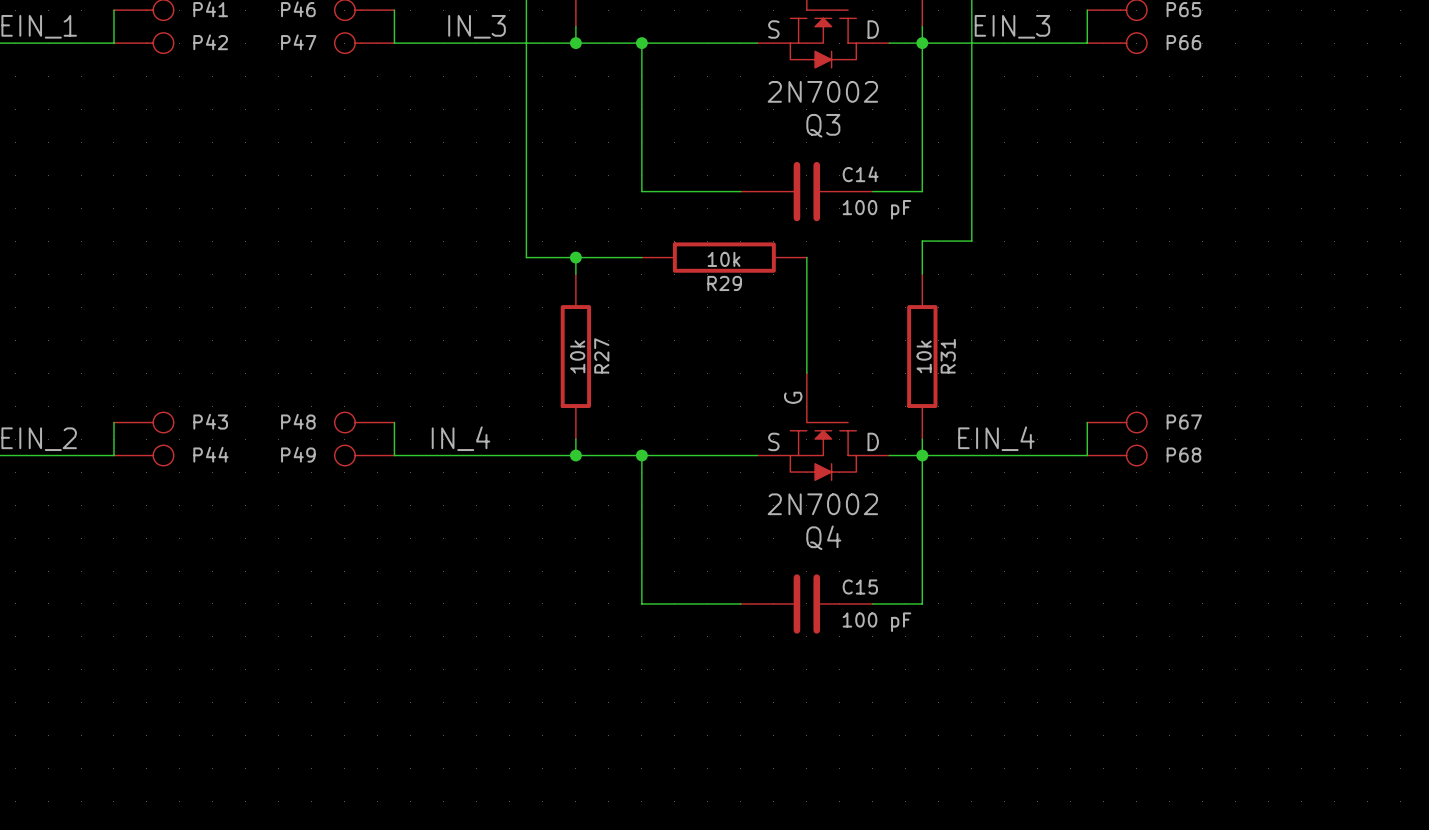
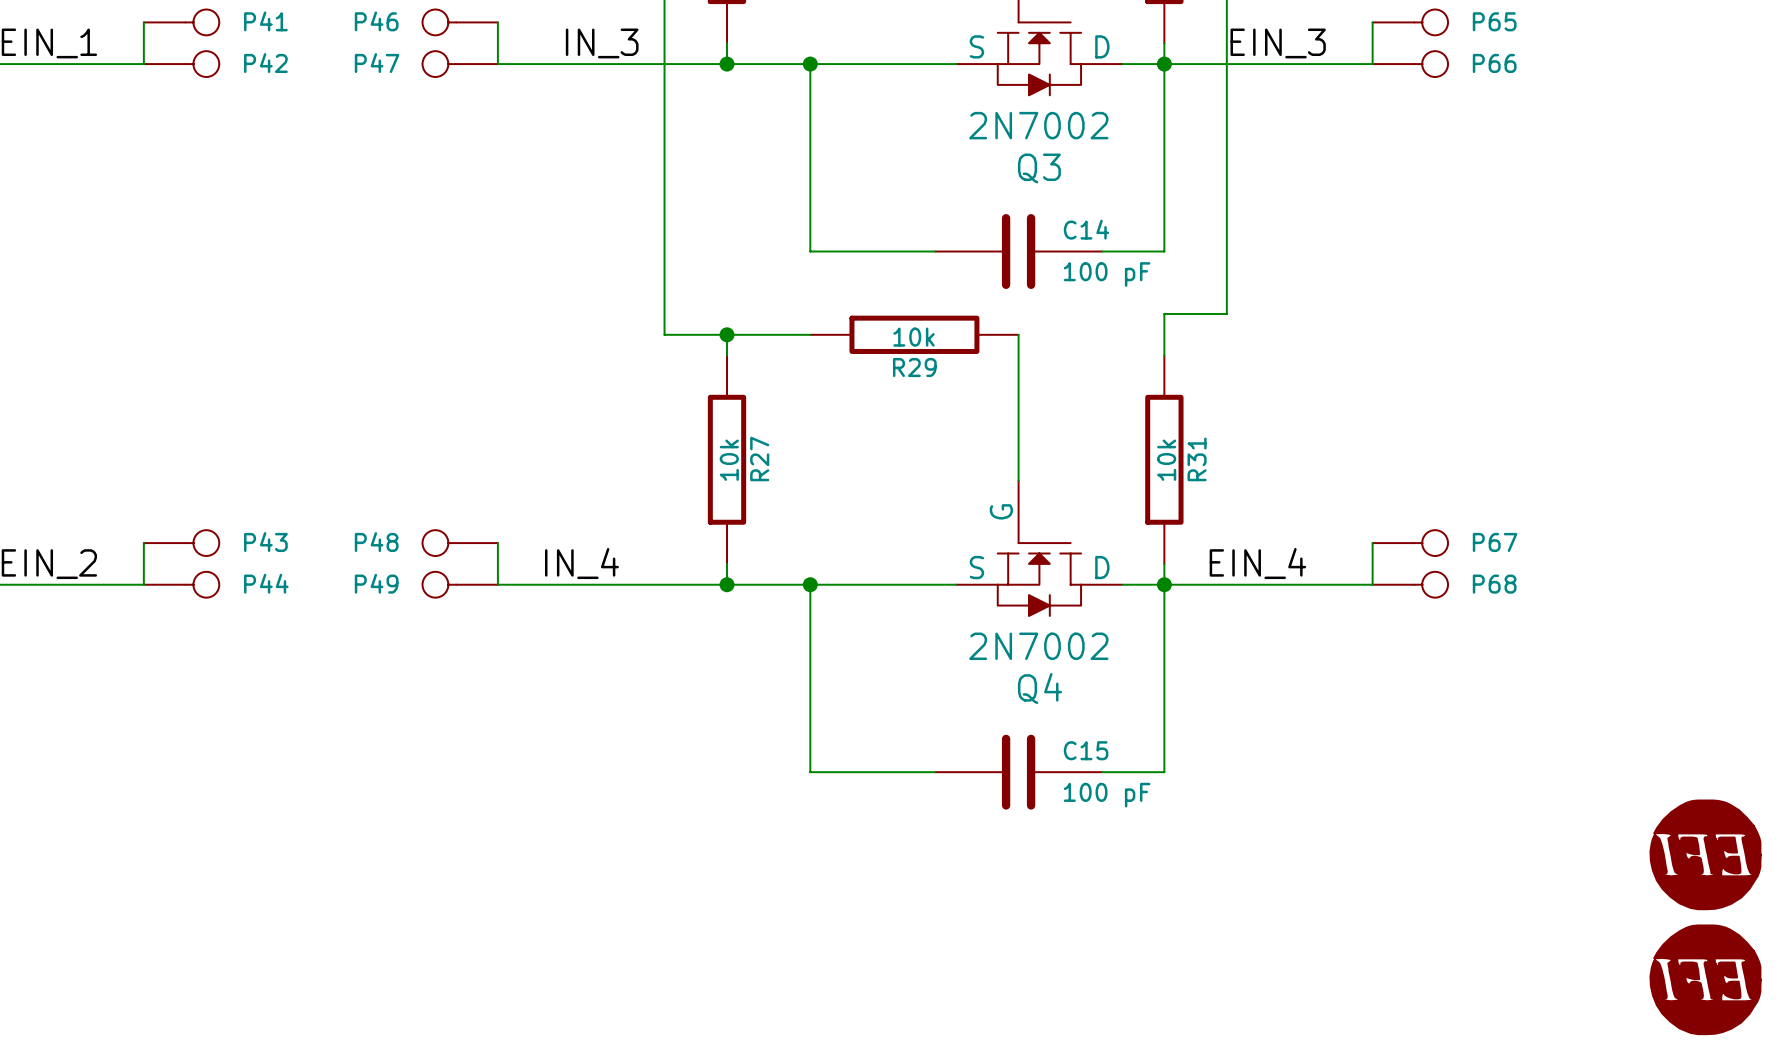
power symbol: none -> (1705, 854)
power symbol: none -> (1705, 979)

